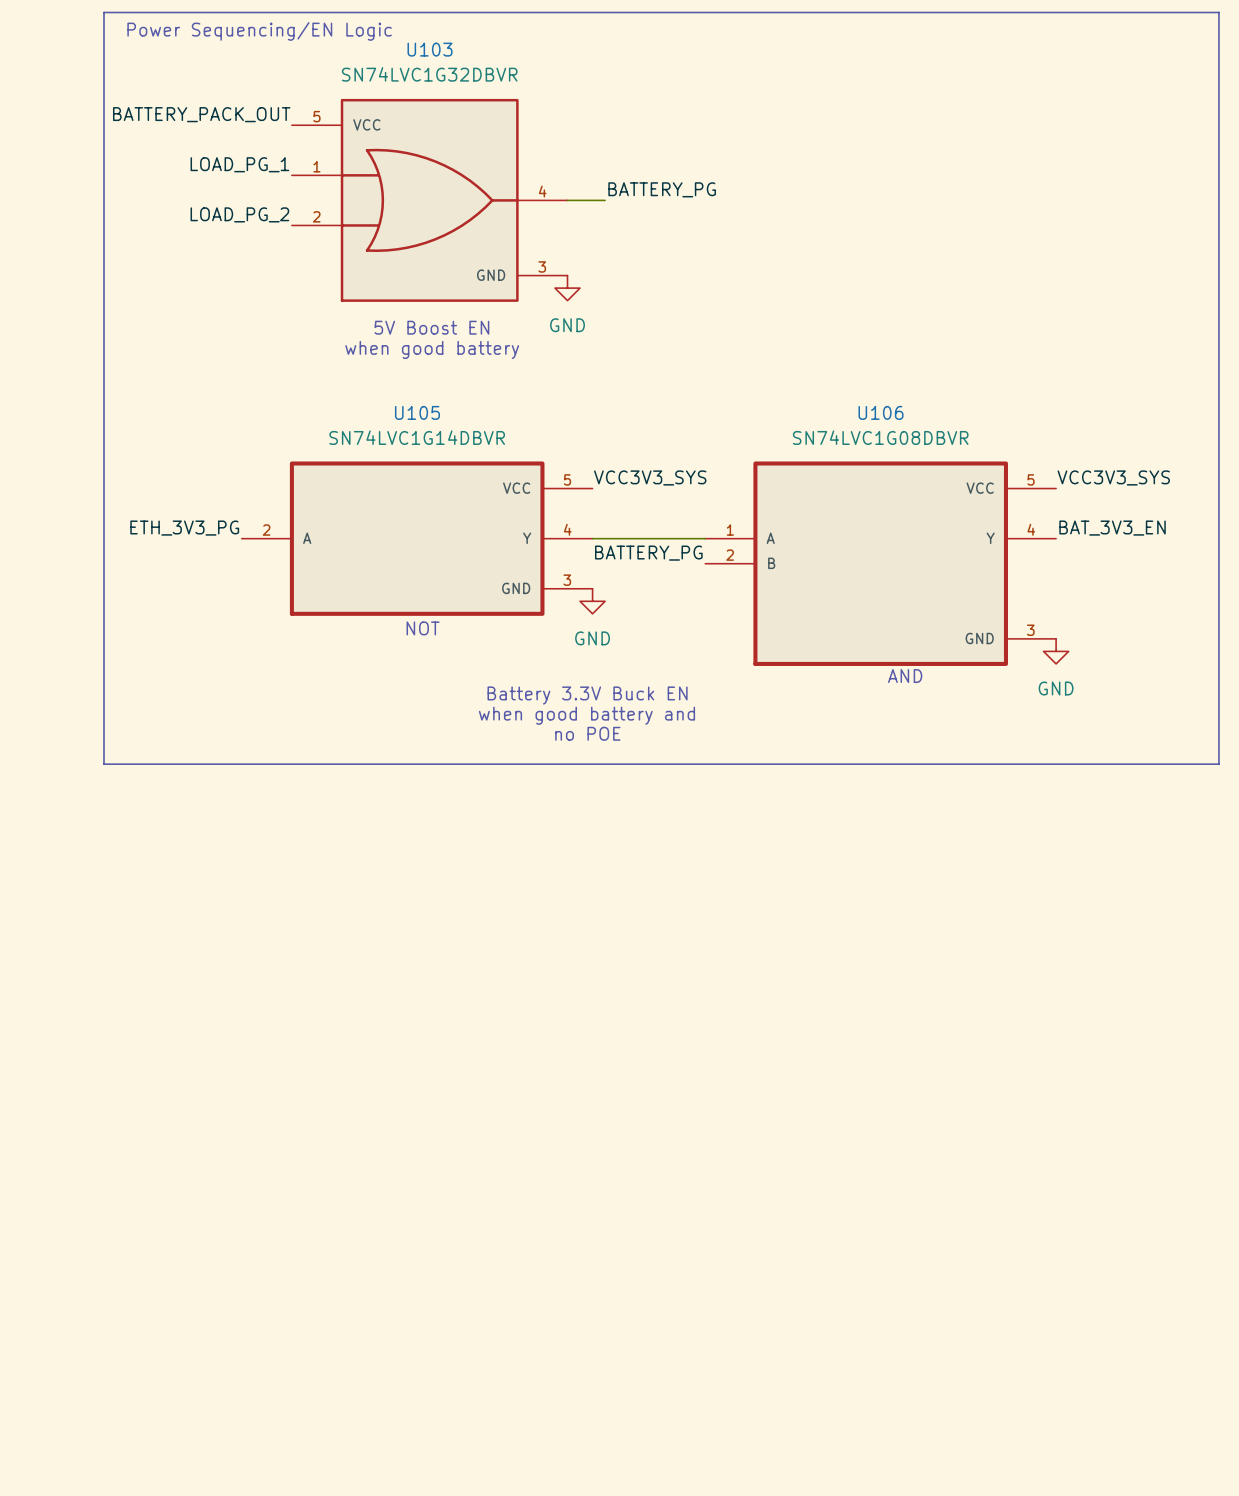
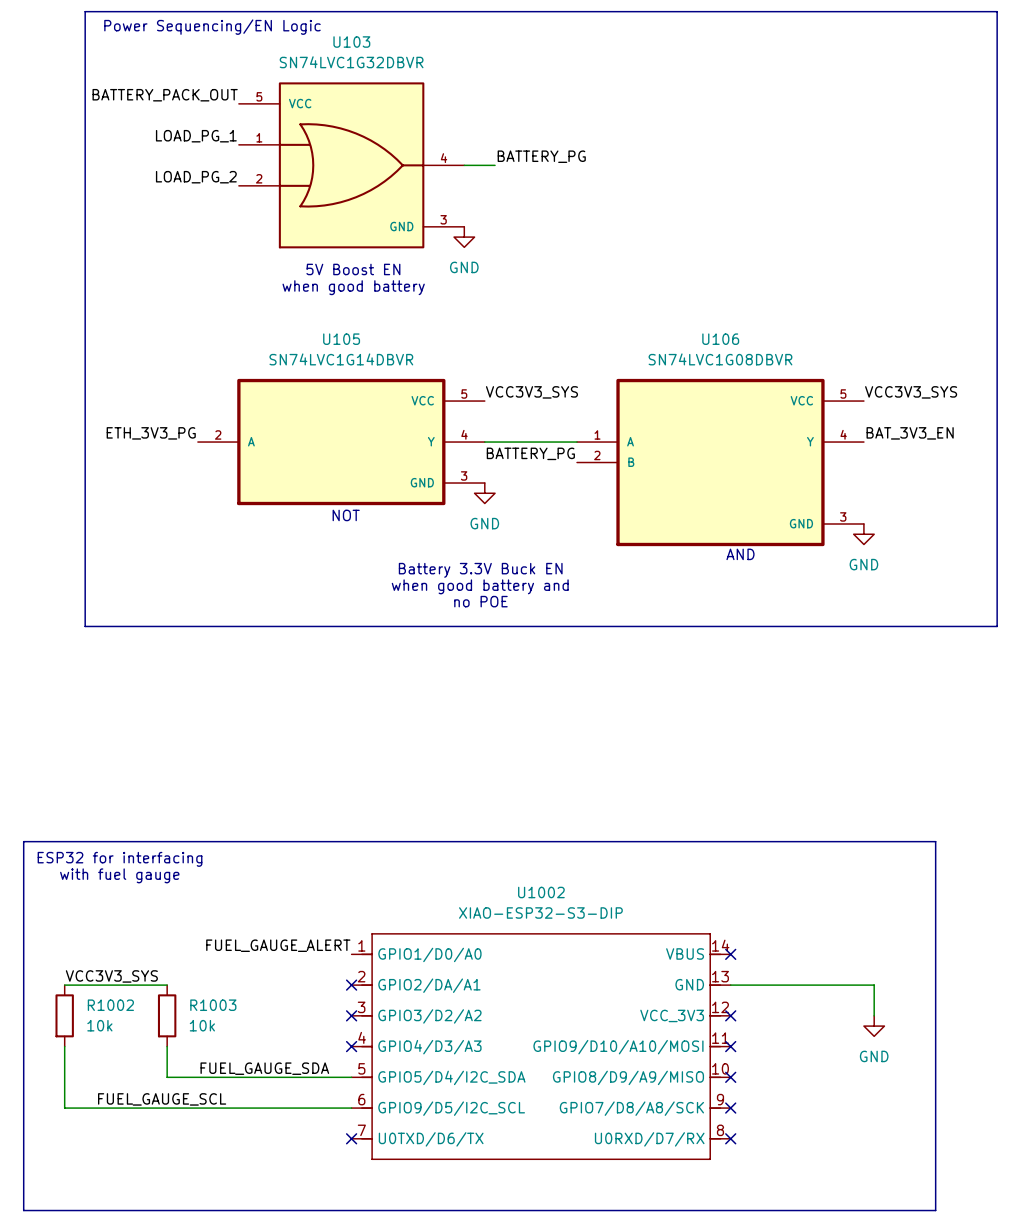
line: none -> (23, 841) (935, 841) (935, 1210) (23, 1210) (23, 841)
text: none -> ESP32 for interfacing (120, 859)
text: none -> with fuel gauge (119, 875)
label: none -> FUEL_GAUGE_ALERT (278, 945)
no-connect mark: none -> (730, 954)
label: none -> VCC3V3_SYS (111, 976)
wire: none -> (64, 985) (167, 985)
no-connect mark: none -> (351, 985)
wire: none -> (730, 985) (874, 985) (874, 1015)
R1002: none -> 10k (64, 1015)
R1003: none -> 10k (167, 1015)
no-connect mark: none -> (351, 1015)
no-connect mark: none -> (730, 1015)
power symbol: none -> GND (874, 1026)
wire: none -> (64, 1046) (64, 1108) (351, 1108)
wire: none -> (167, 1046) (167, 1077) (351, 1077)
no-connect mark: none -> (351, 1046)
U1002: none -> XIAO-ESP32-S3-DIP (541, 1046)
no-connect mark: none -> (730, 1046)
label: none -> FUEL_GAUGE_SDA (264, 1068)
no-connect mark: none -> (730, 1077)
label: none -> FUEL_GAUGE_SCL (162, 1099)
no-connect mark: none -> (730, 1108)
no-connect mark: none -> (351, 1138)
no-connect mark: none -> (730, 1138)

